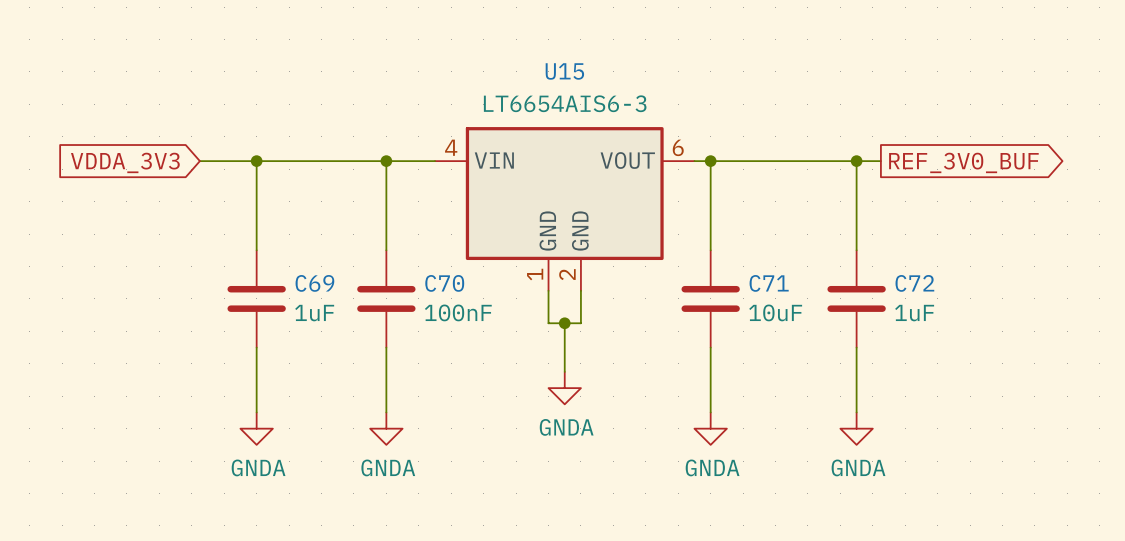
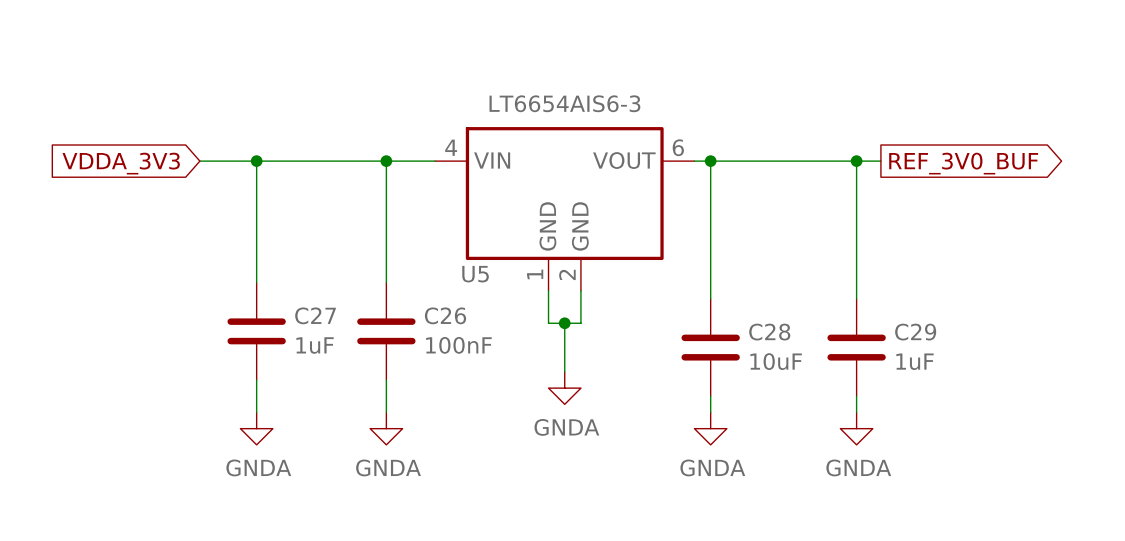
U15 name: U15 (564, 71) -> U5 (475, 274)
C69: 1uF (256, 298) -> none
C70: 100nF (386, 298) -> none
C71: 10uF (710, 298) -> none
C72: 1uF (856, 298) -> none
C27: none -> 1uF (256, 331)
C26: none -> 100nF (386, 331)
C28: none -> 10uF (710, 347)
C29: none -> 1uF (856, 347)

